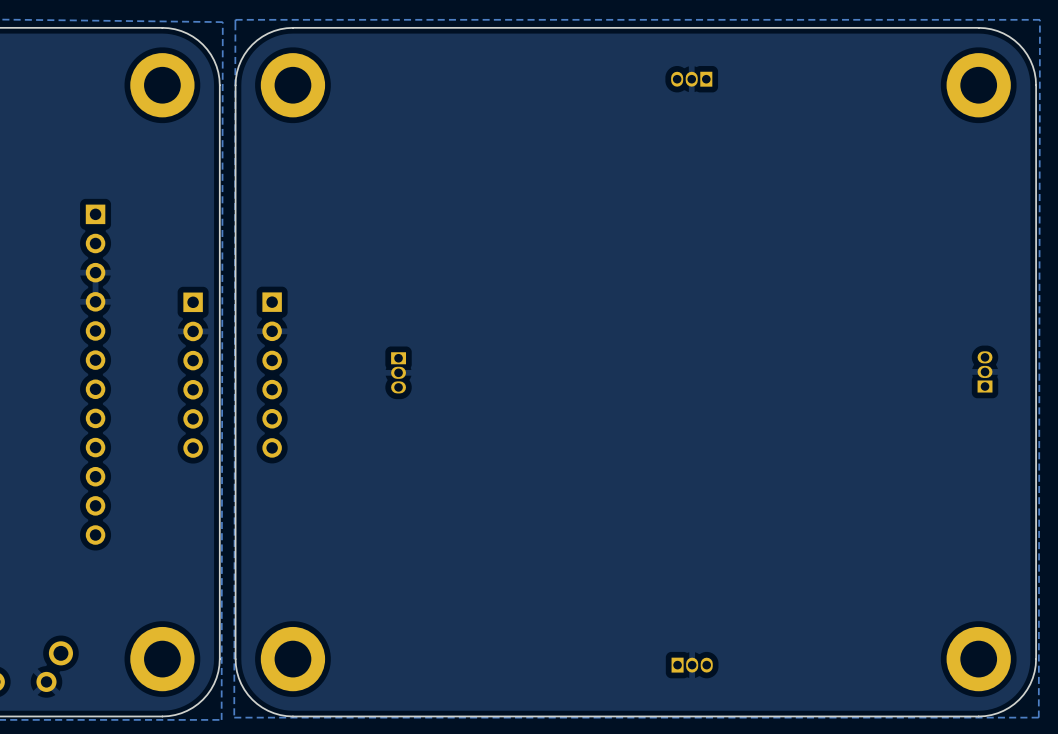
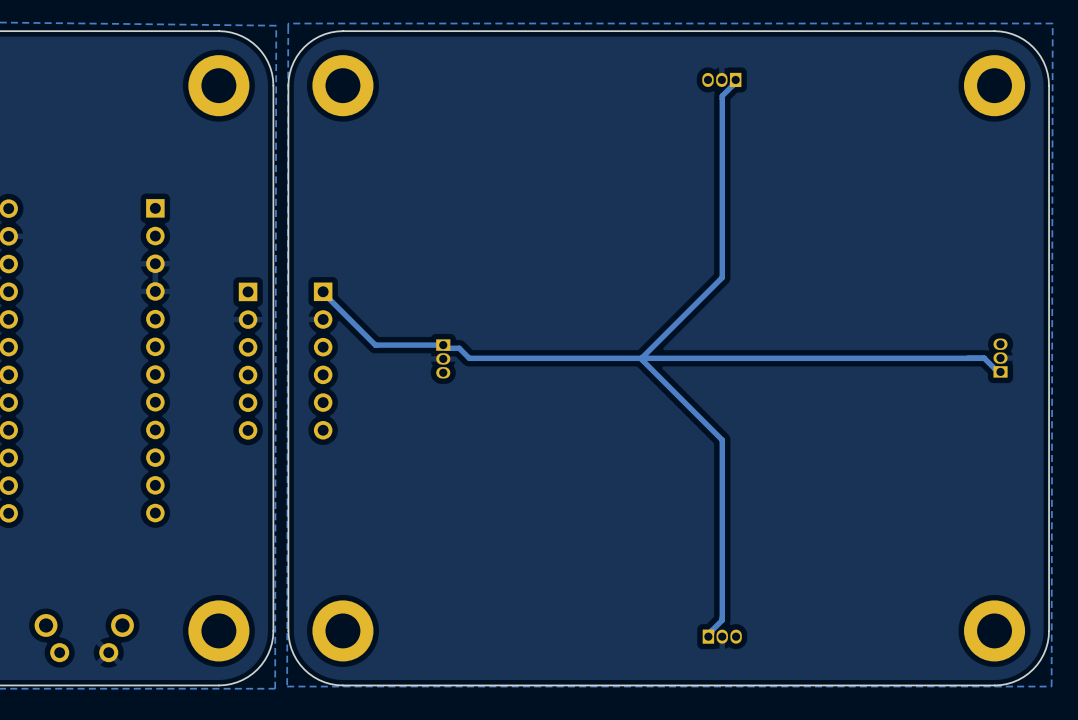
track: none -> (735, 79) (722, 95) (722, 277) (641, 358) (722, 440) (722, 620) (708, 636)
track: none -> (323, 291) (375, 345)
track: none -> (375, 345) (443, 345) (446, 348) (459, 348) (469, 358) (984, 358) (1000, 371)

